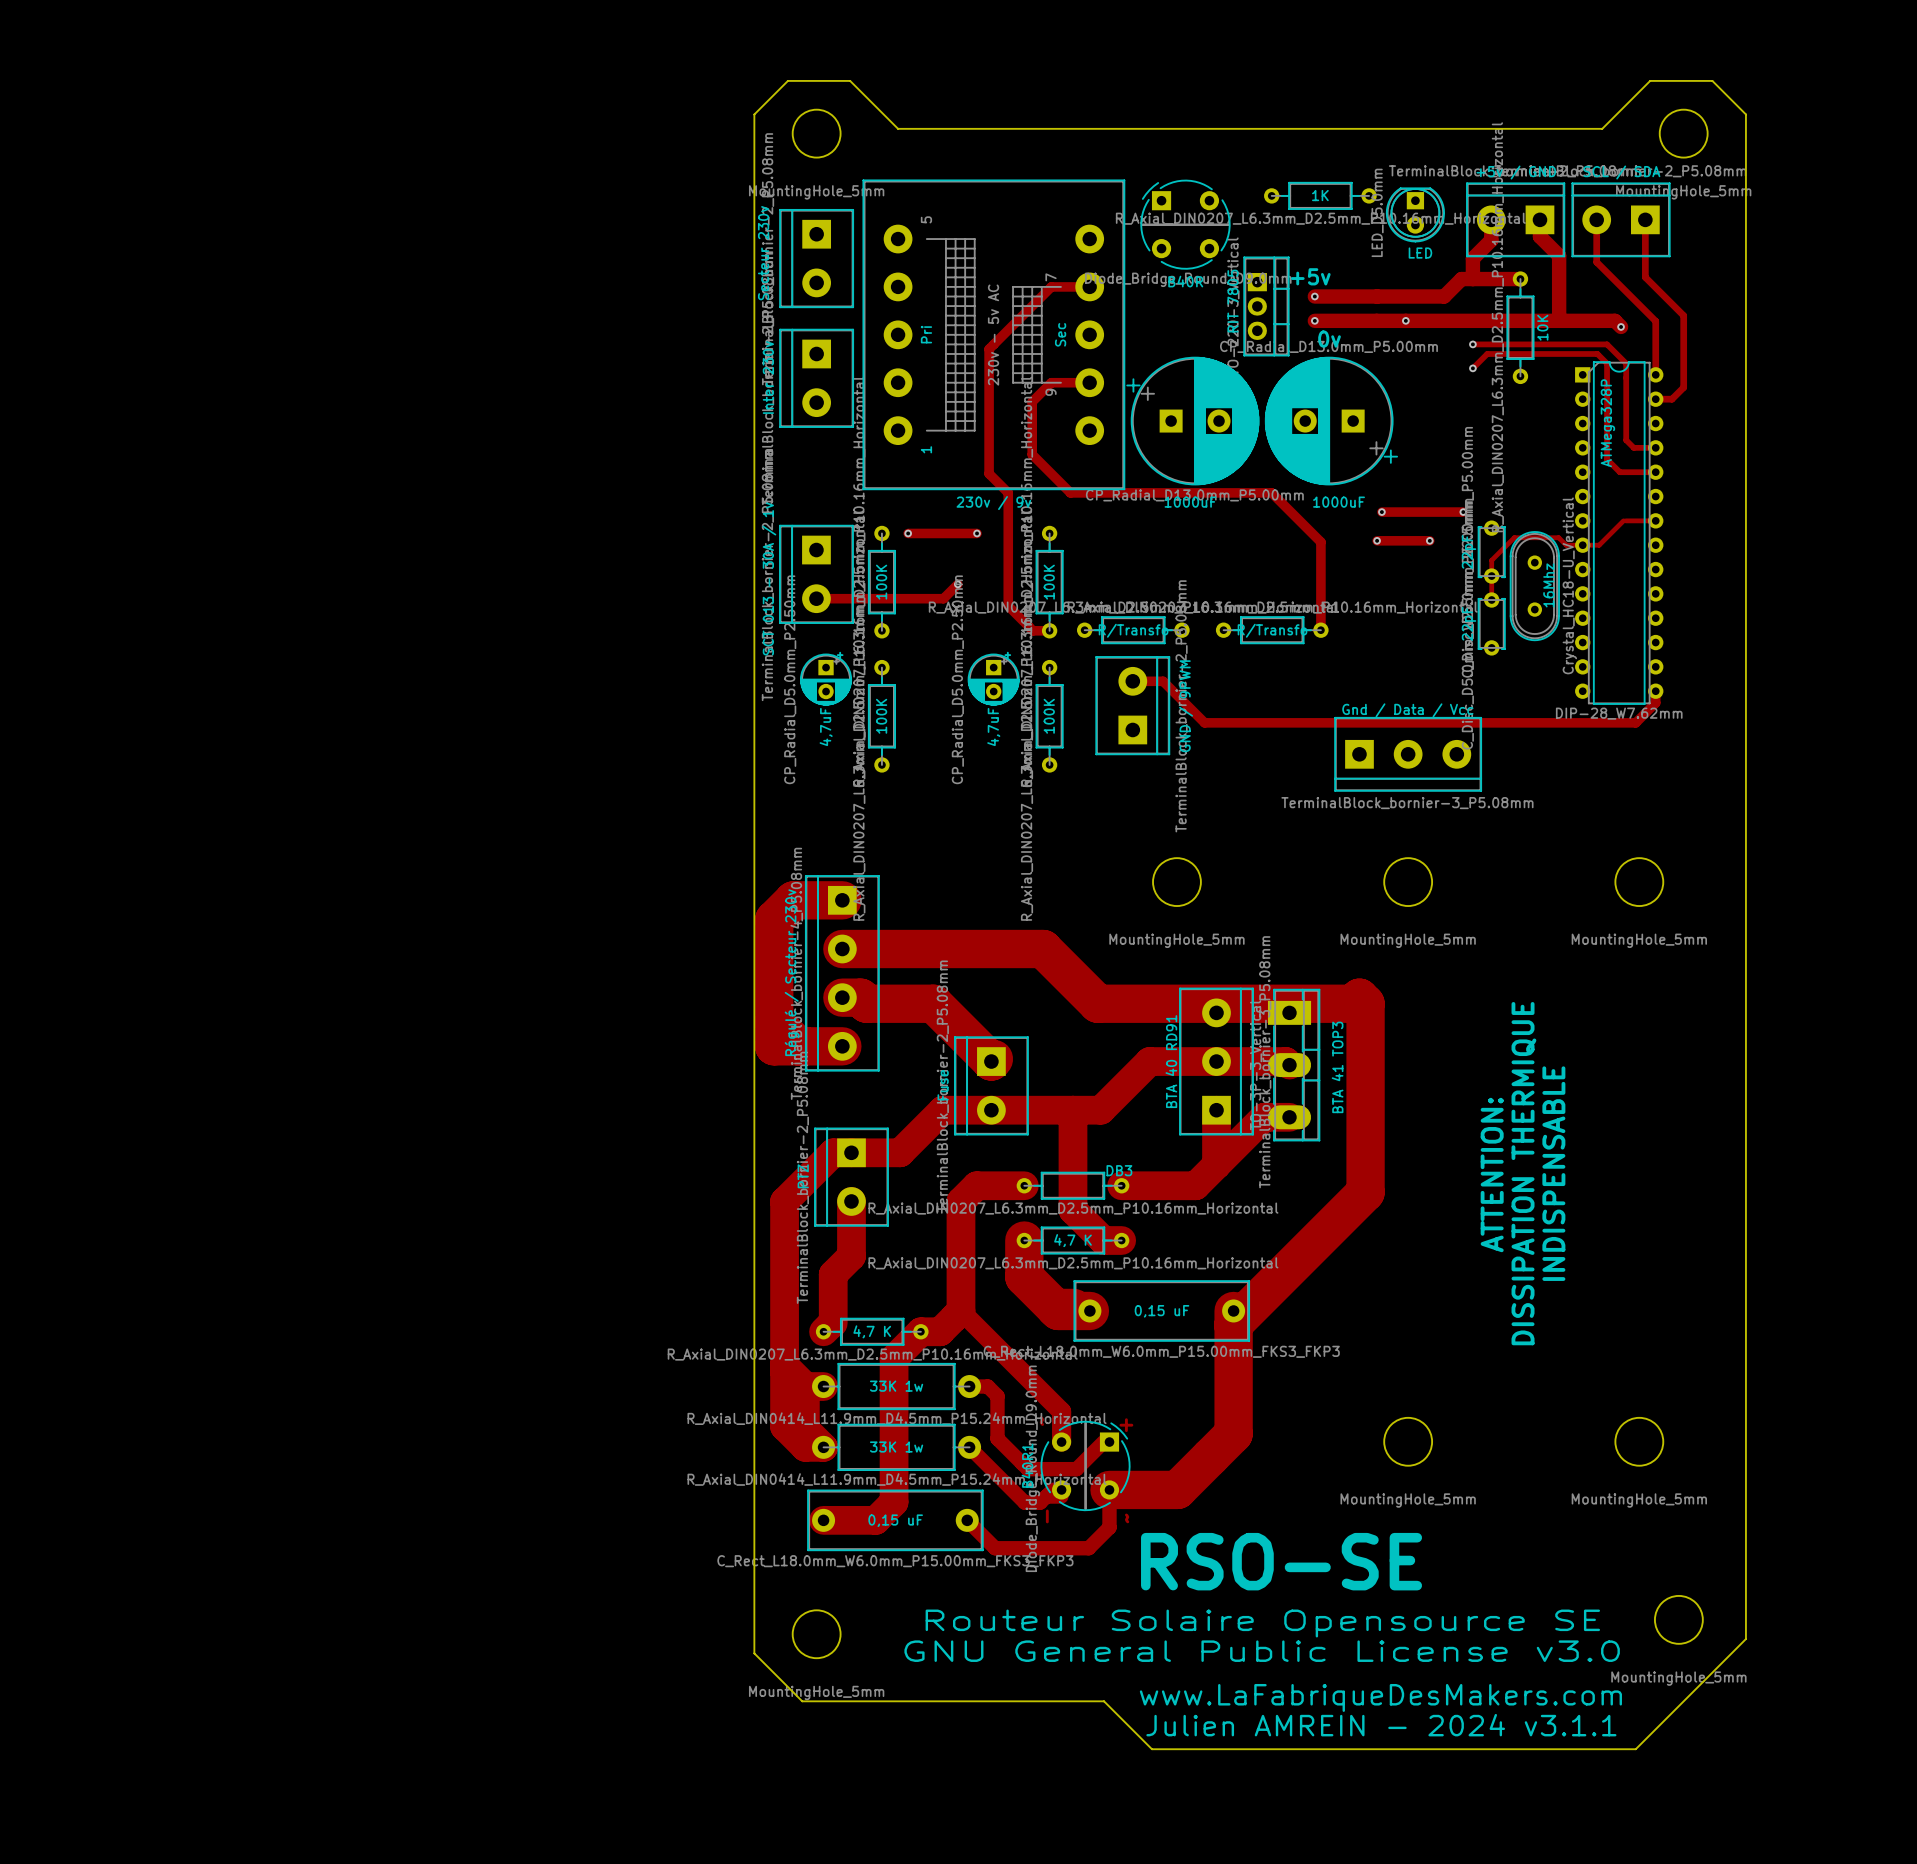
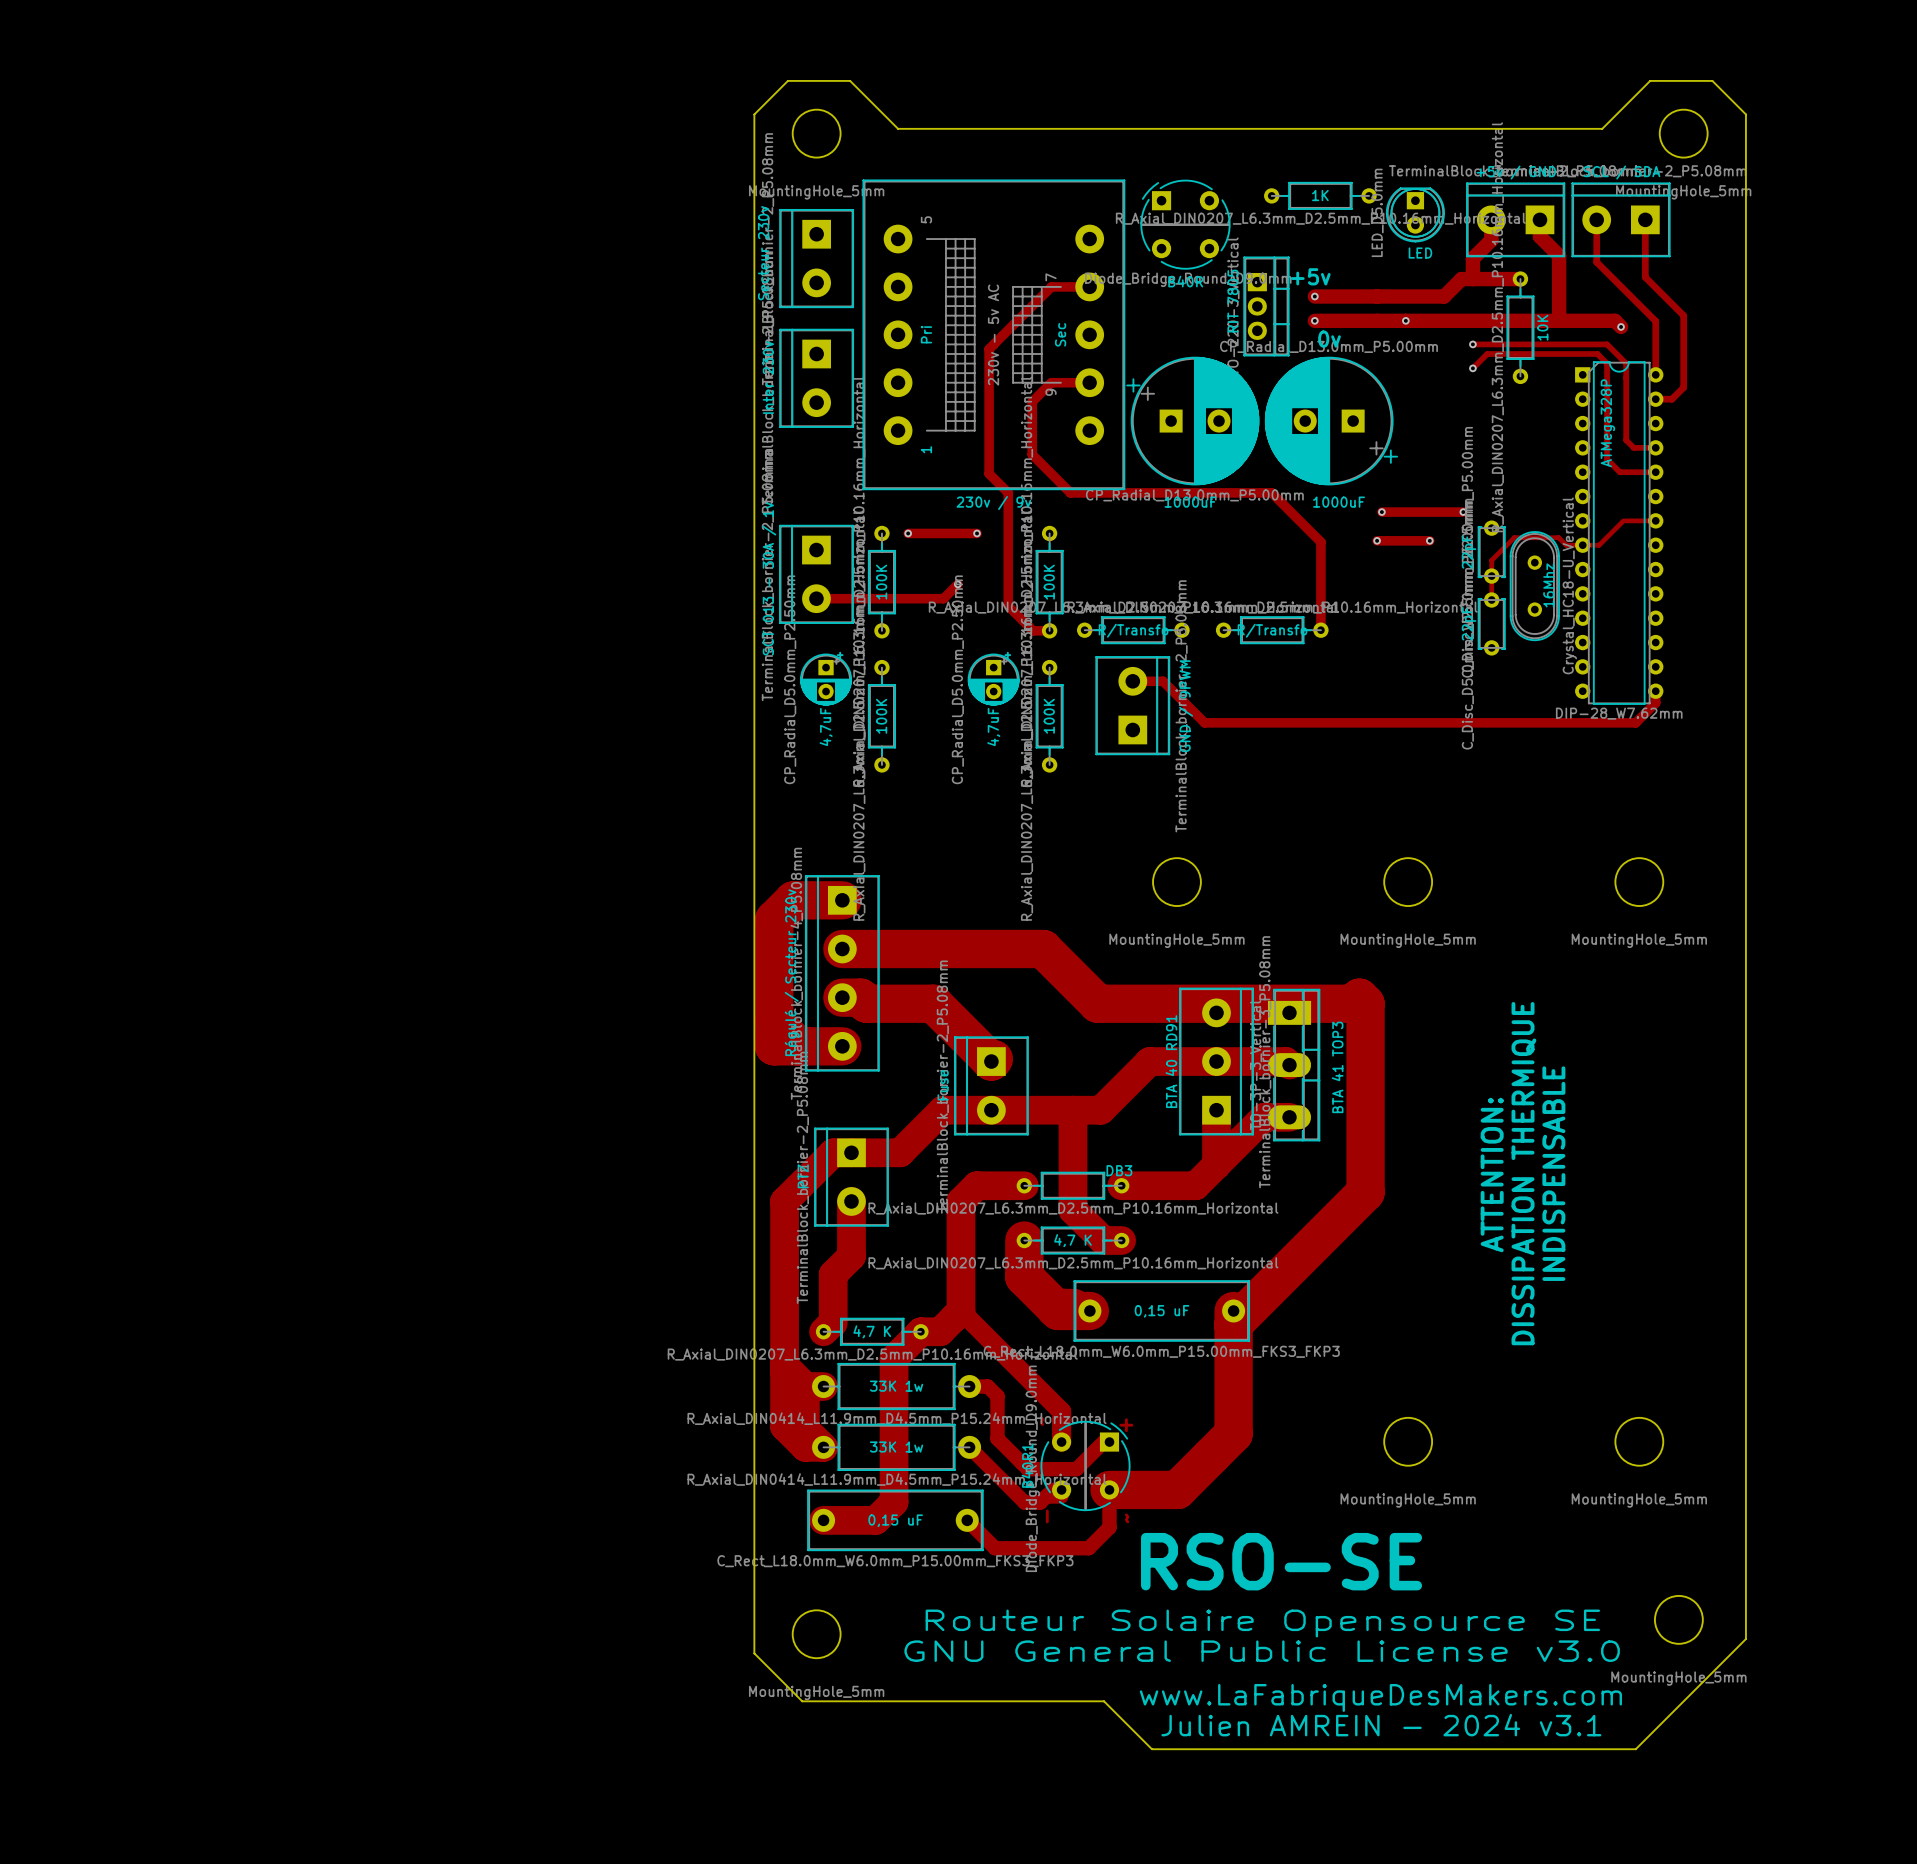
Gnd / Data / Vcc: TerminalBlock_bornier-3_P5.08mm (1408, 754) -> none
text: Julien AMREIN - 2024 v3.1.1 (1381, 1725) -> Julien AMREIN - 2024 v3.1 (1381, 1725)

